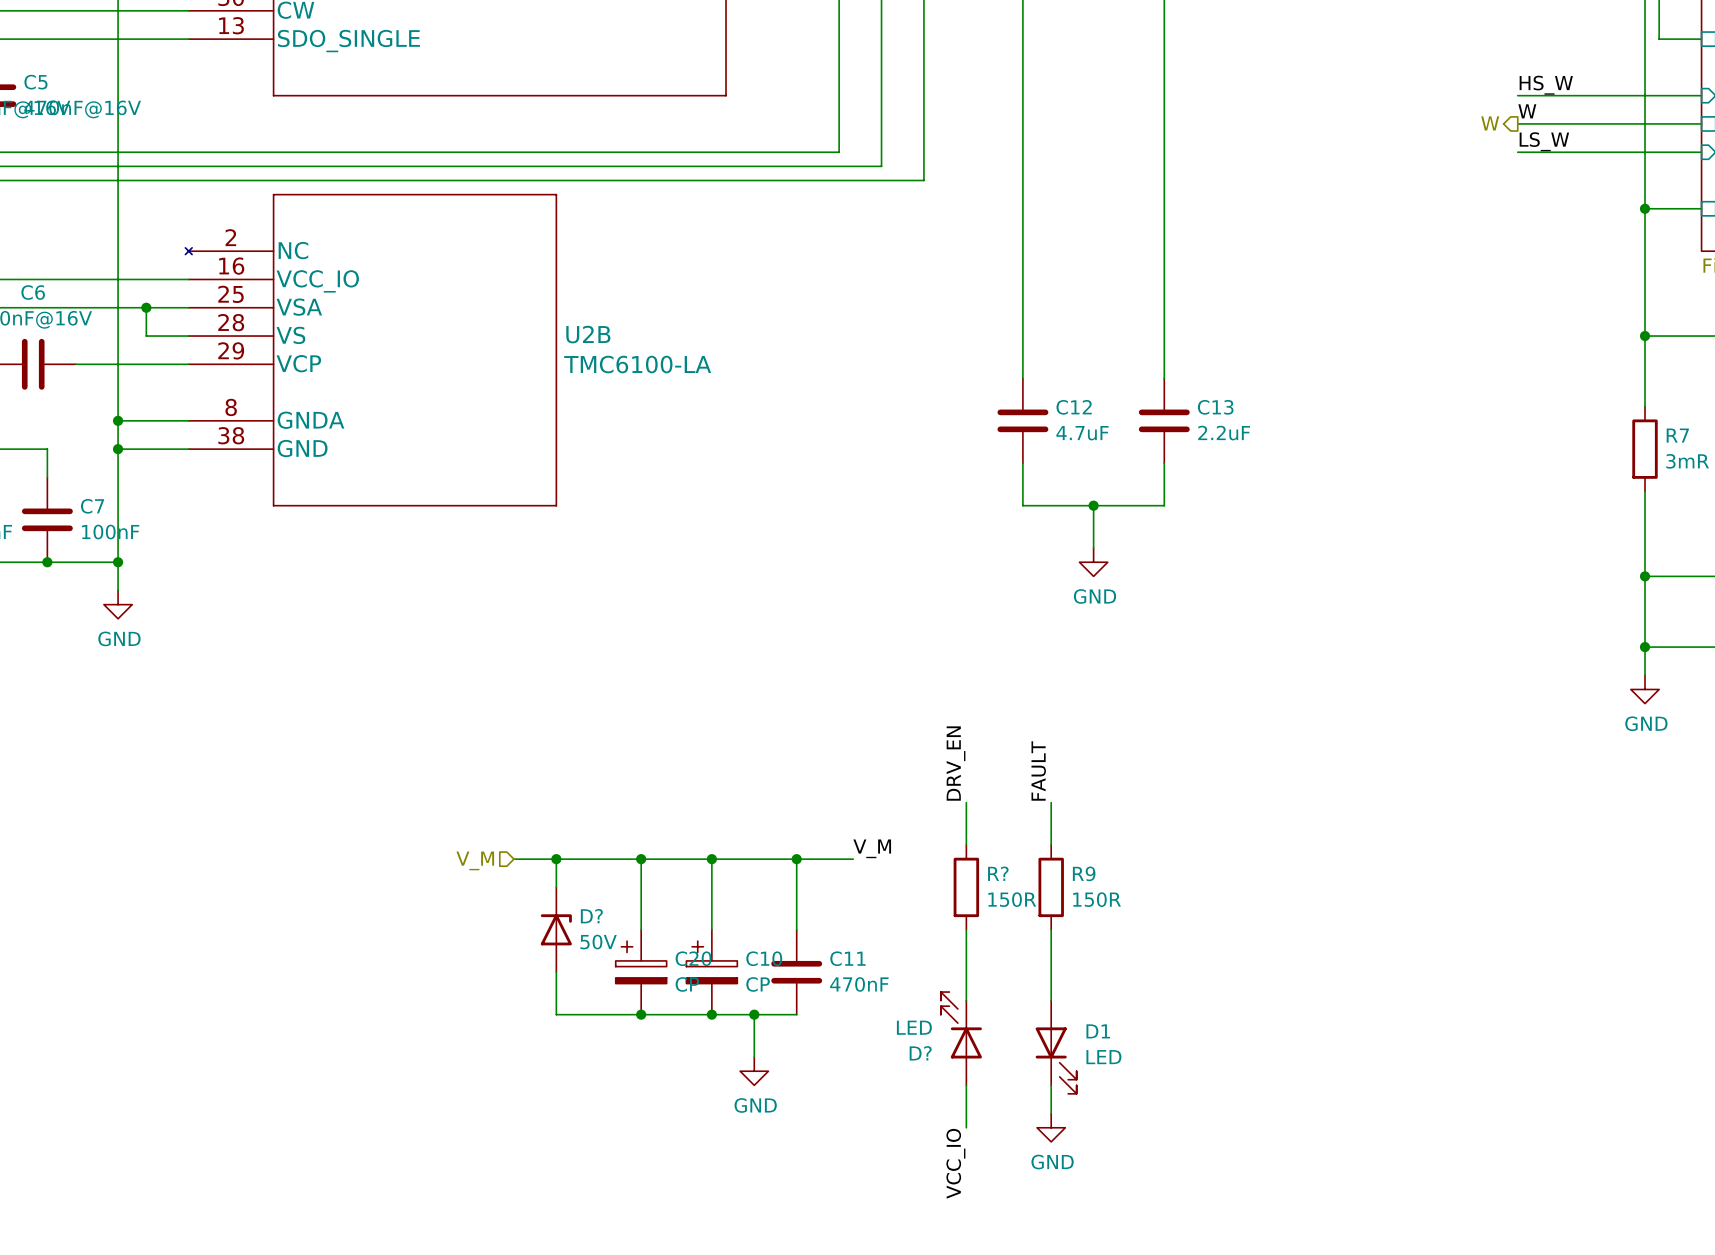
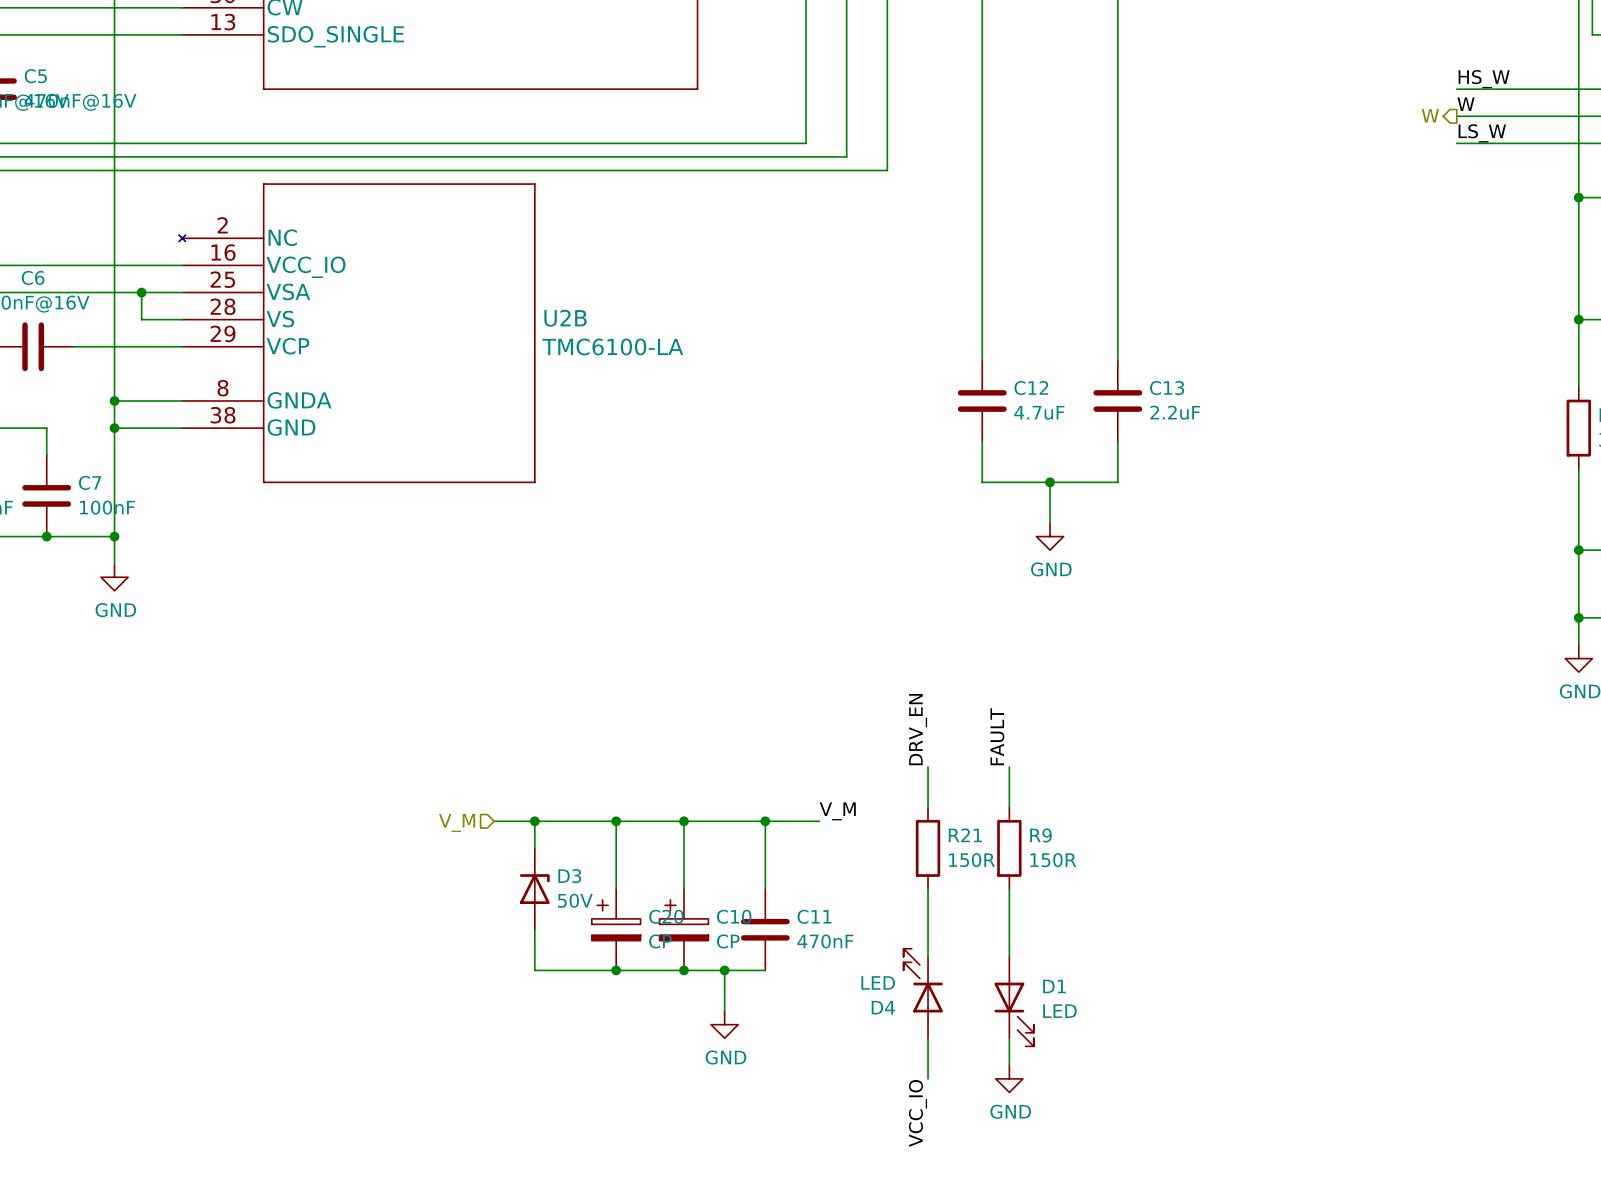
R? name: R? (998, 873) -> R21 (965, 835)
D? name: D? (591, 916) -> D3 (569, 876)
D? name: D? (920, 1053) -> D4 (883, 1007)

